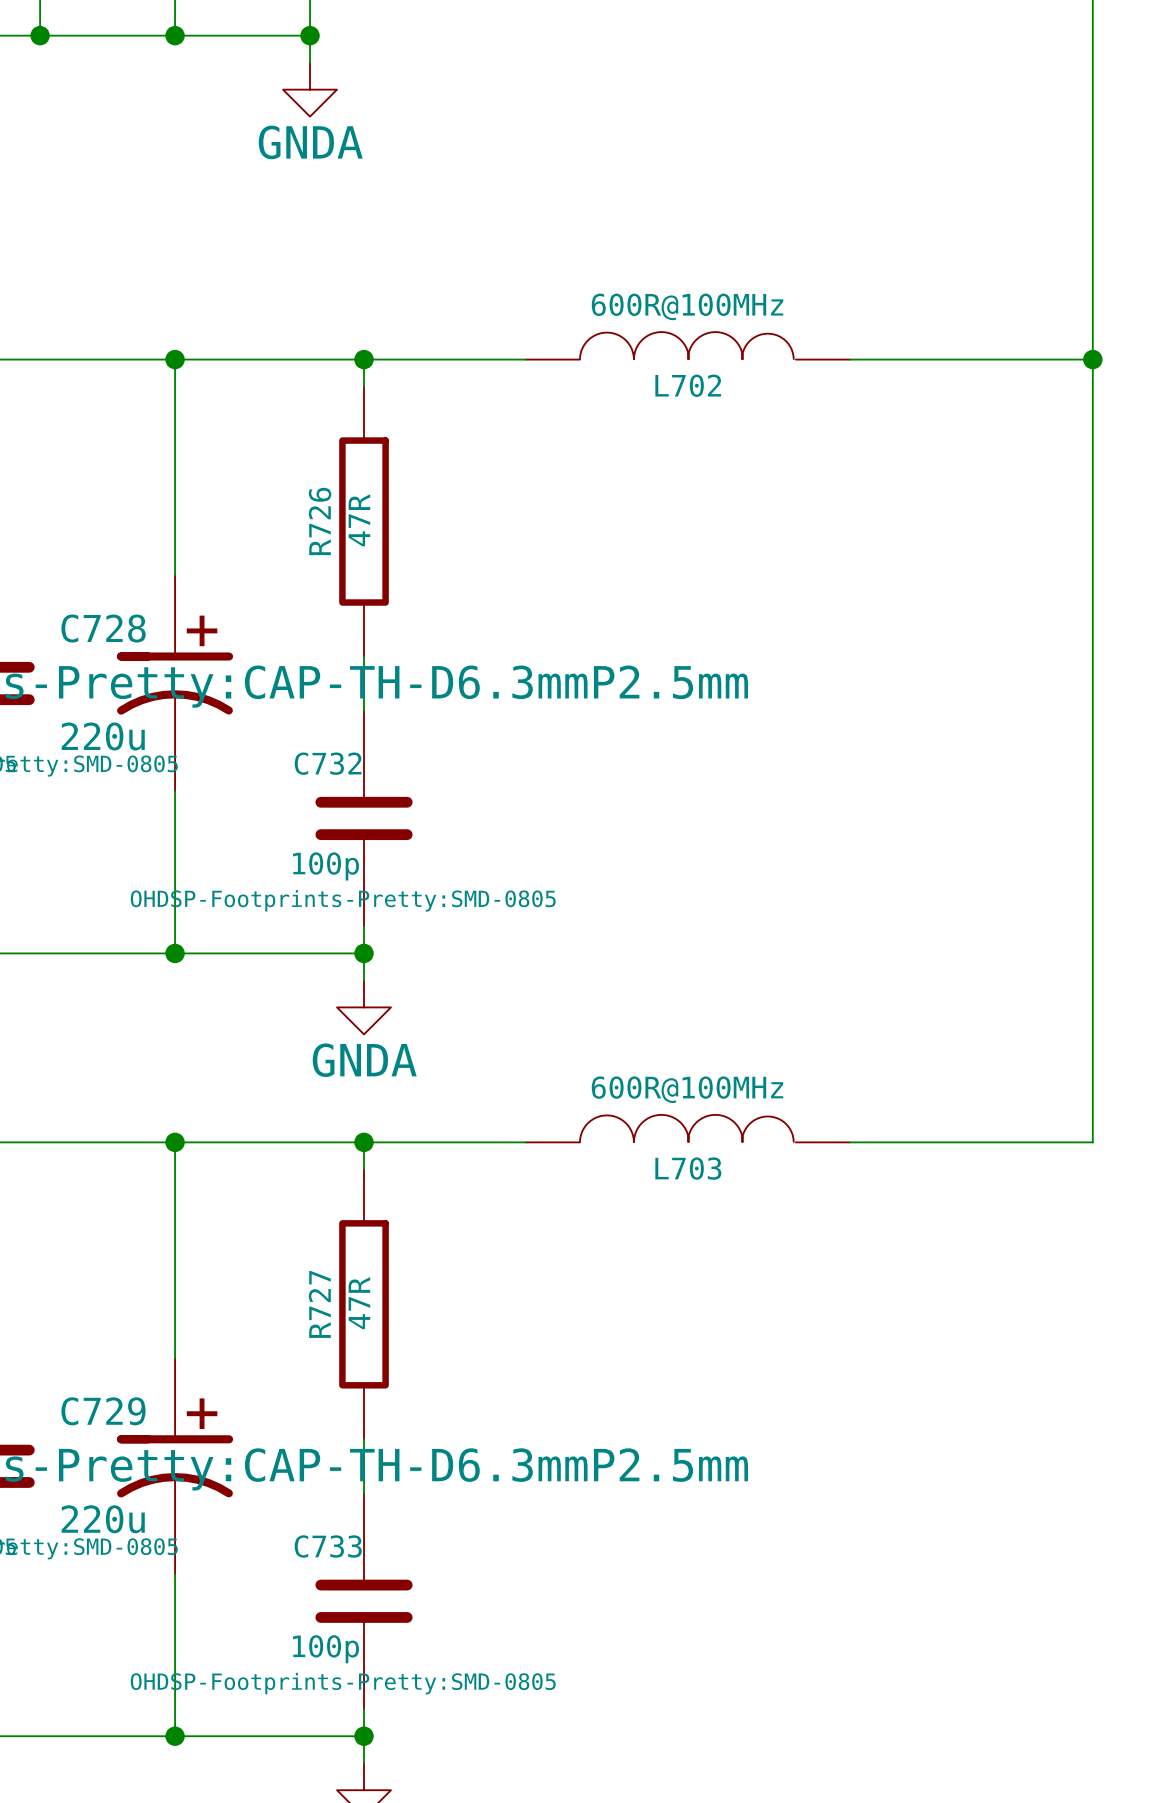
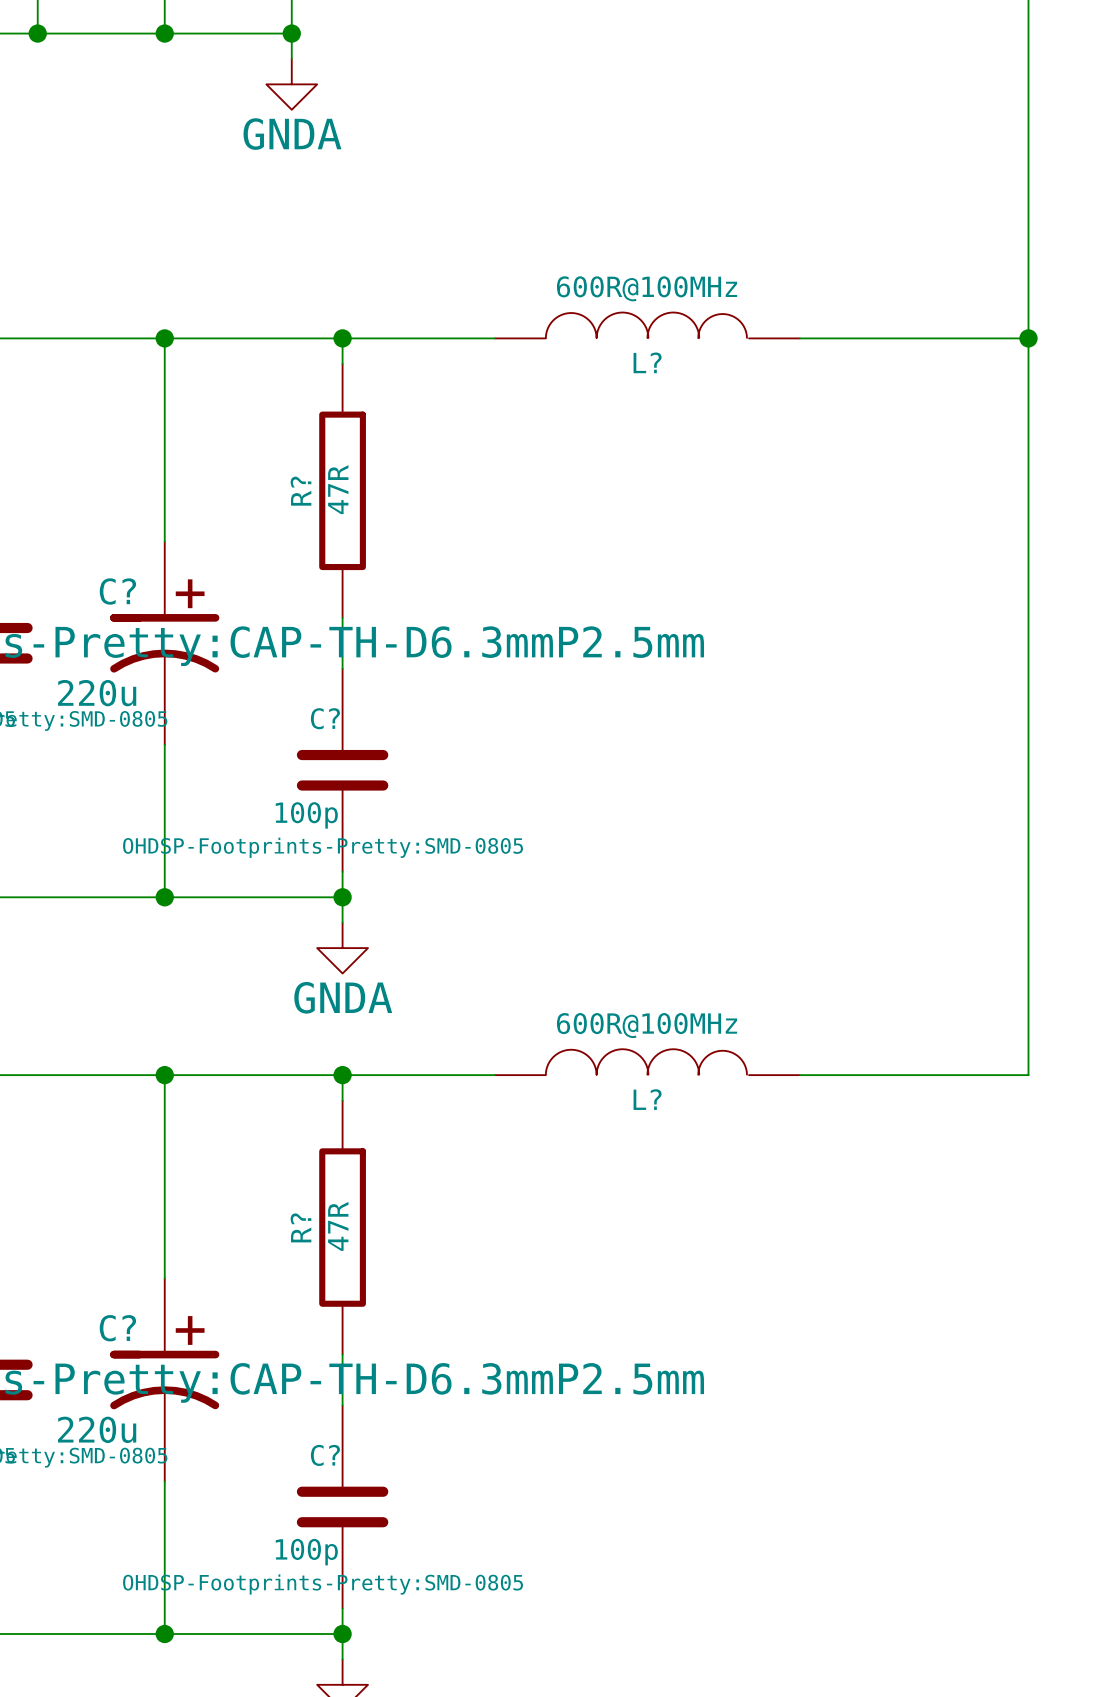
L702 name: L702 (688, 385) -> L? (647, 362)
R726 name: R726 (320, 521) -> R? (300, 491)
C728 name: C728 (103, 628) -> C? (117, 591)
C732 name: C732 (328, 763) -> C? (325, 718)
L703 name: L703 (688, 1168) -> L? (647, 1099)
R727 name: R727 (319, 1304) -> R? (300, 1227)
C729 name: C729 (103, 1411) -> C? (117, 1328)
C733 name: C733 (328, 1546) -> C? (325, 1455)

